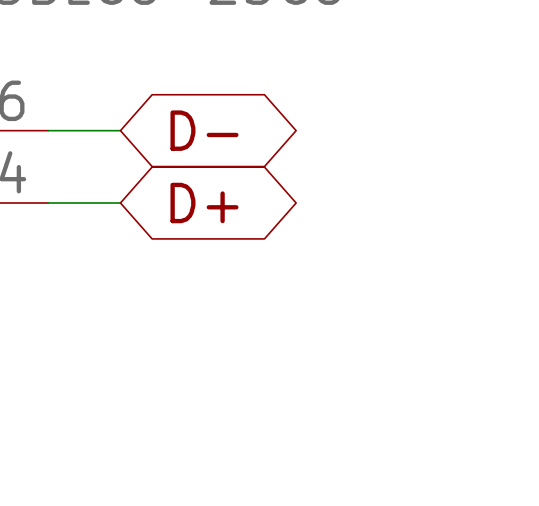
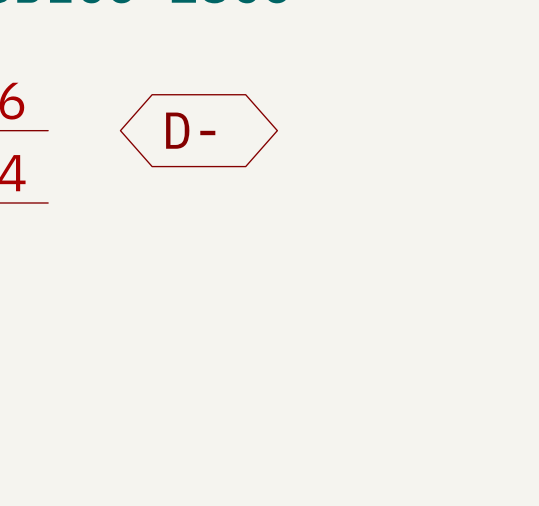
wire: (48, 130) (120, 130) -> none
wire: (48, 202) (120, 202) -> none
global label: D+ (204, 202) -> none

